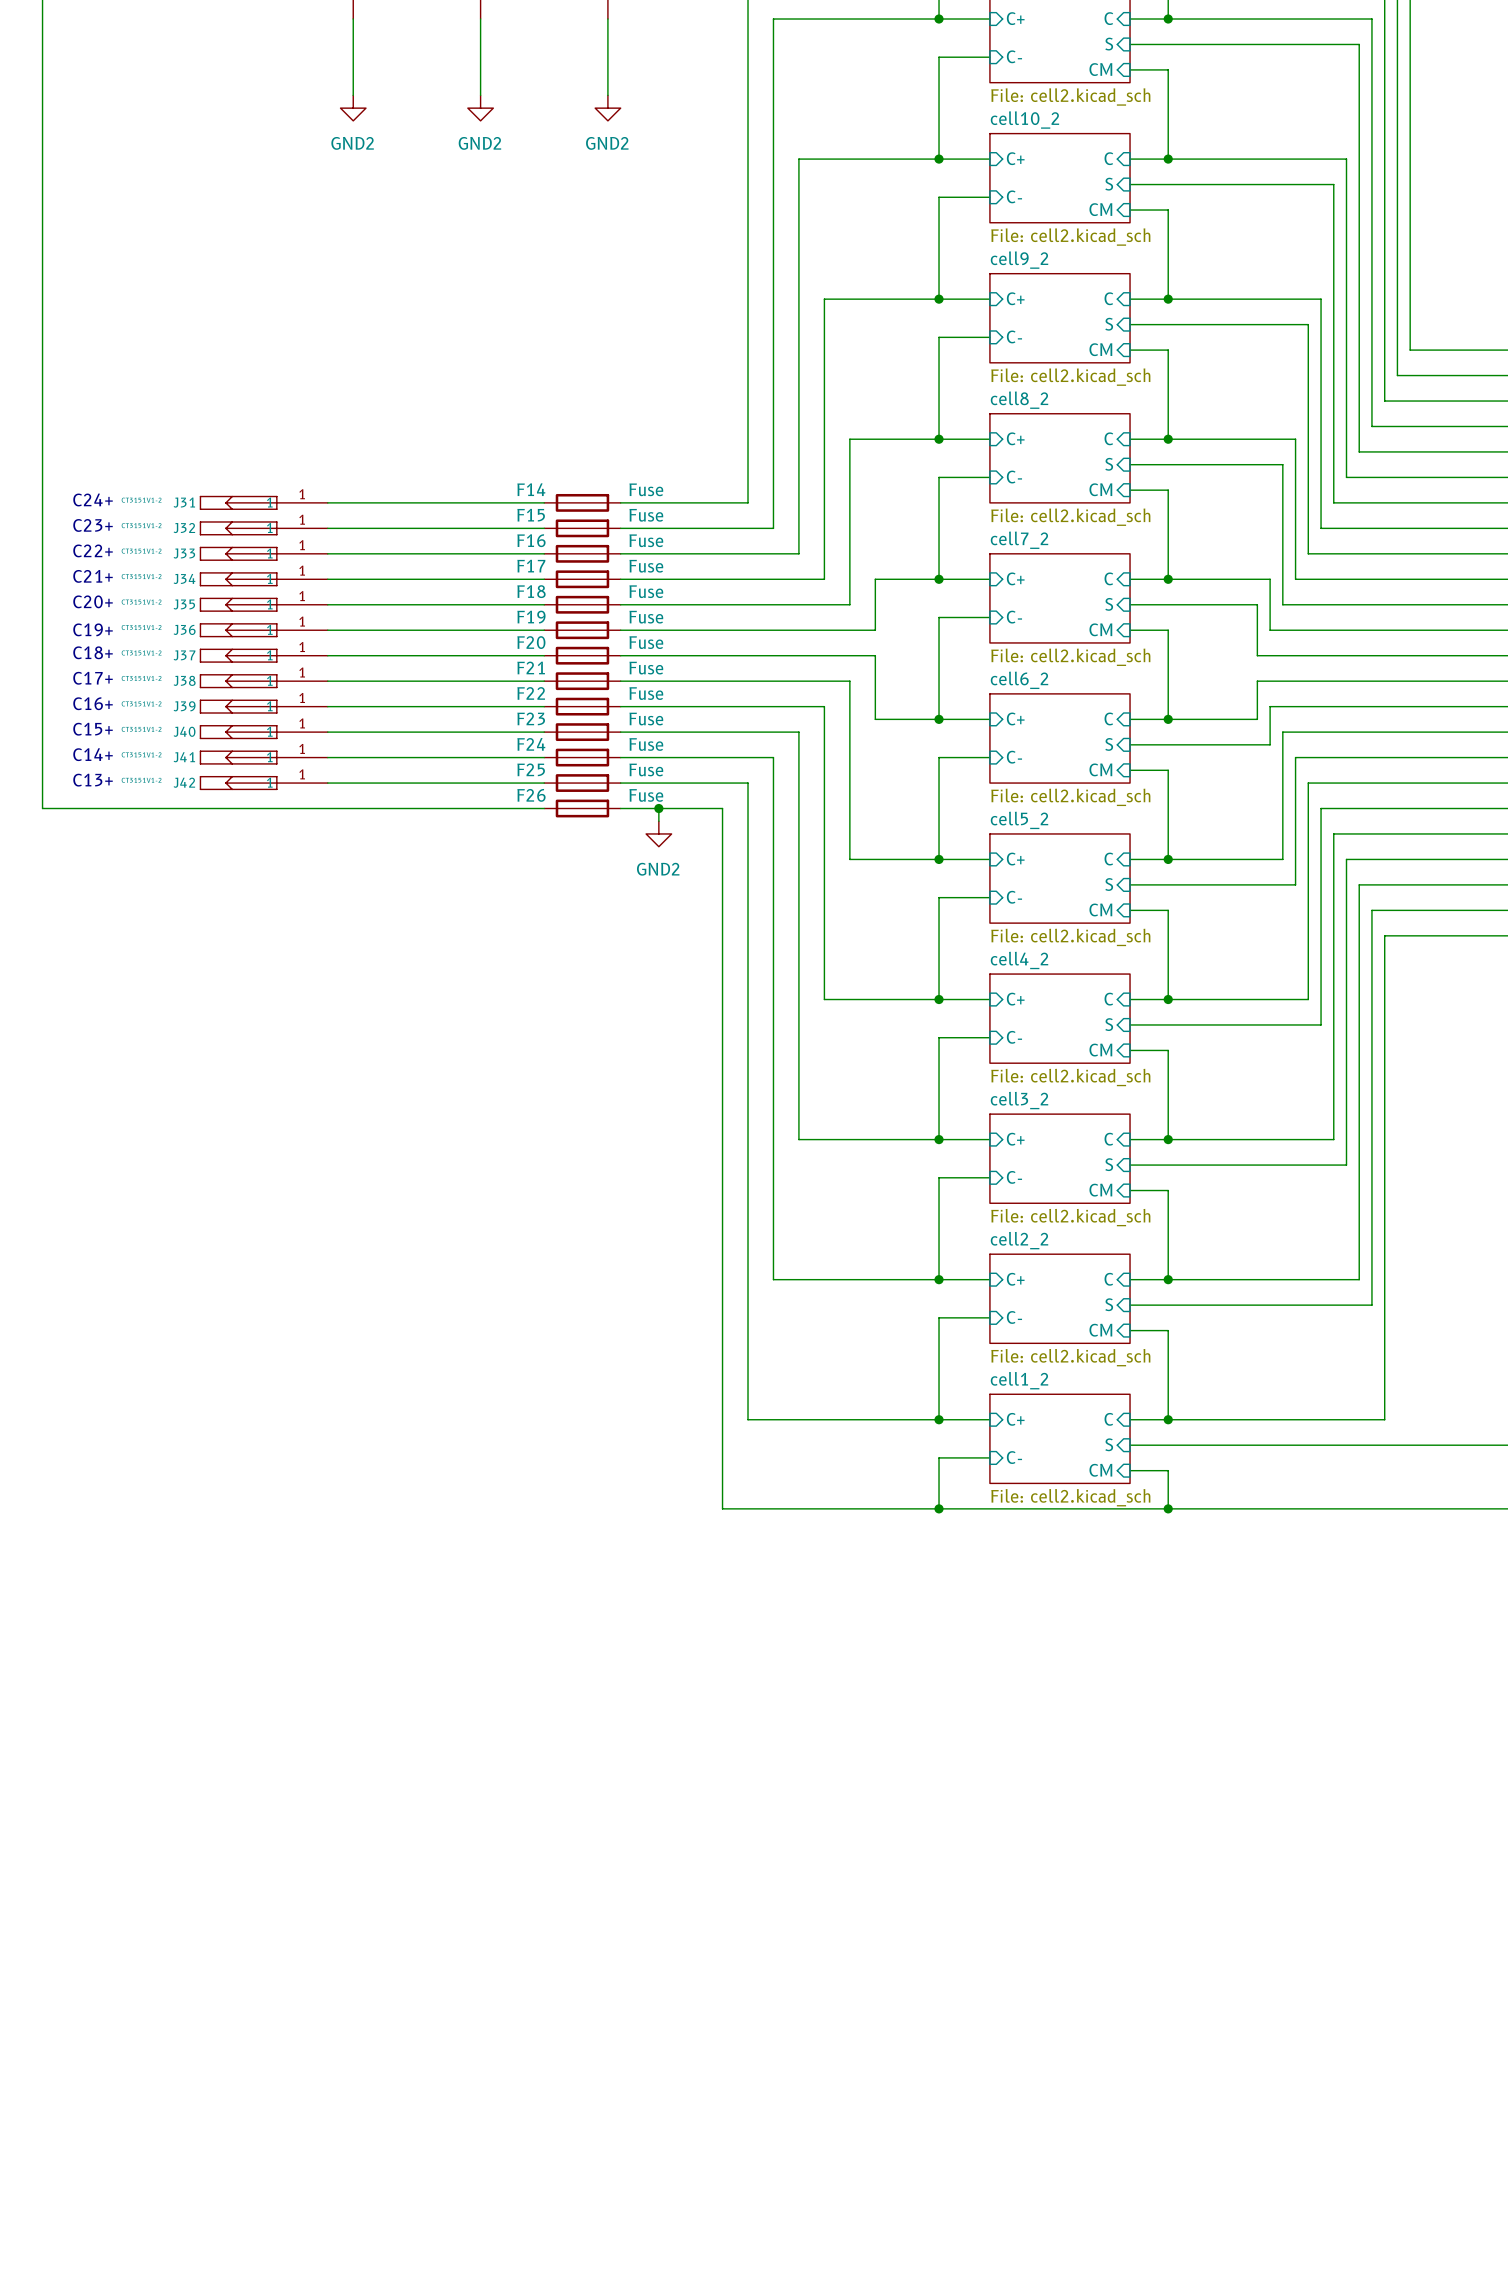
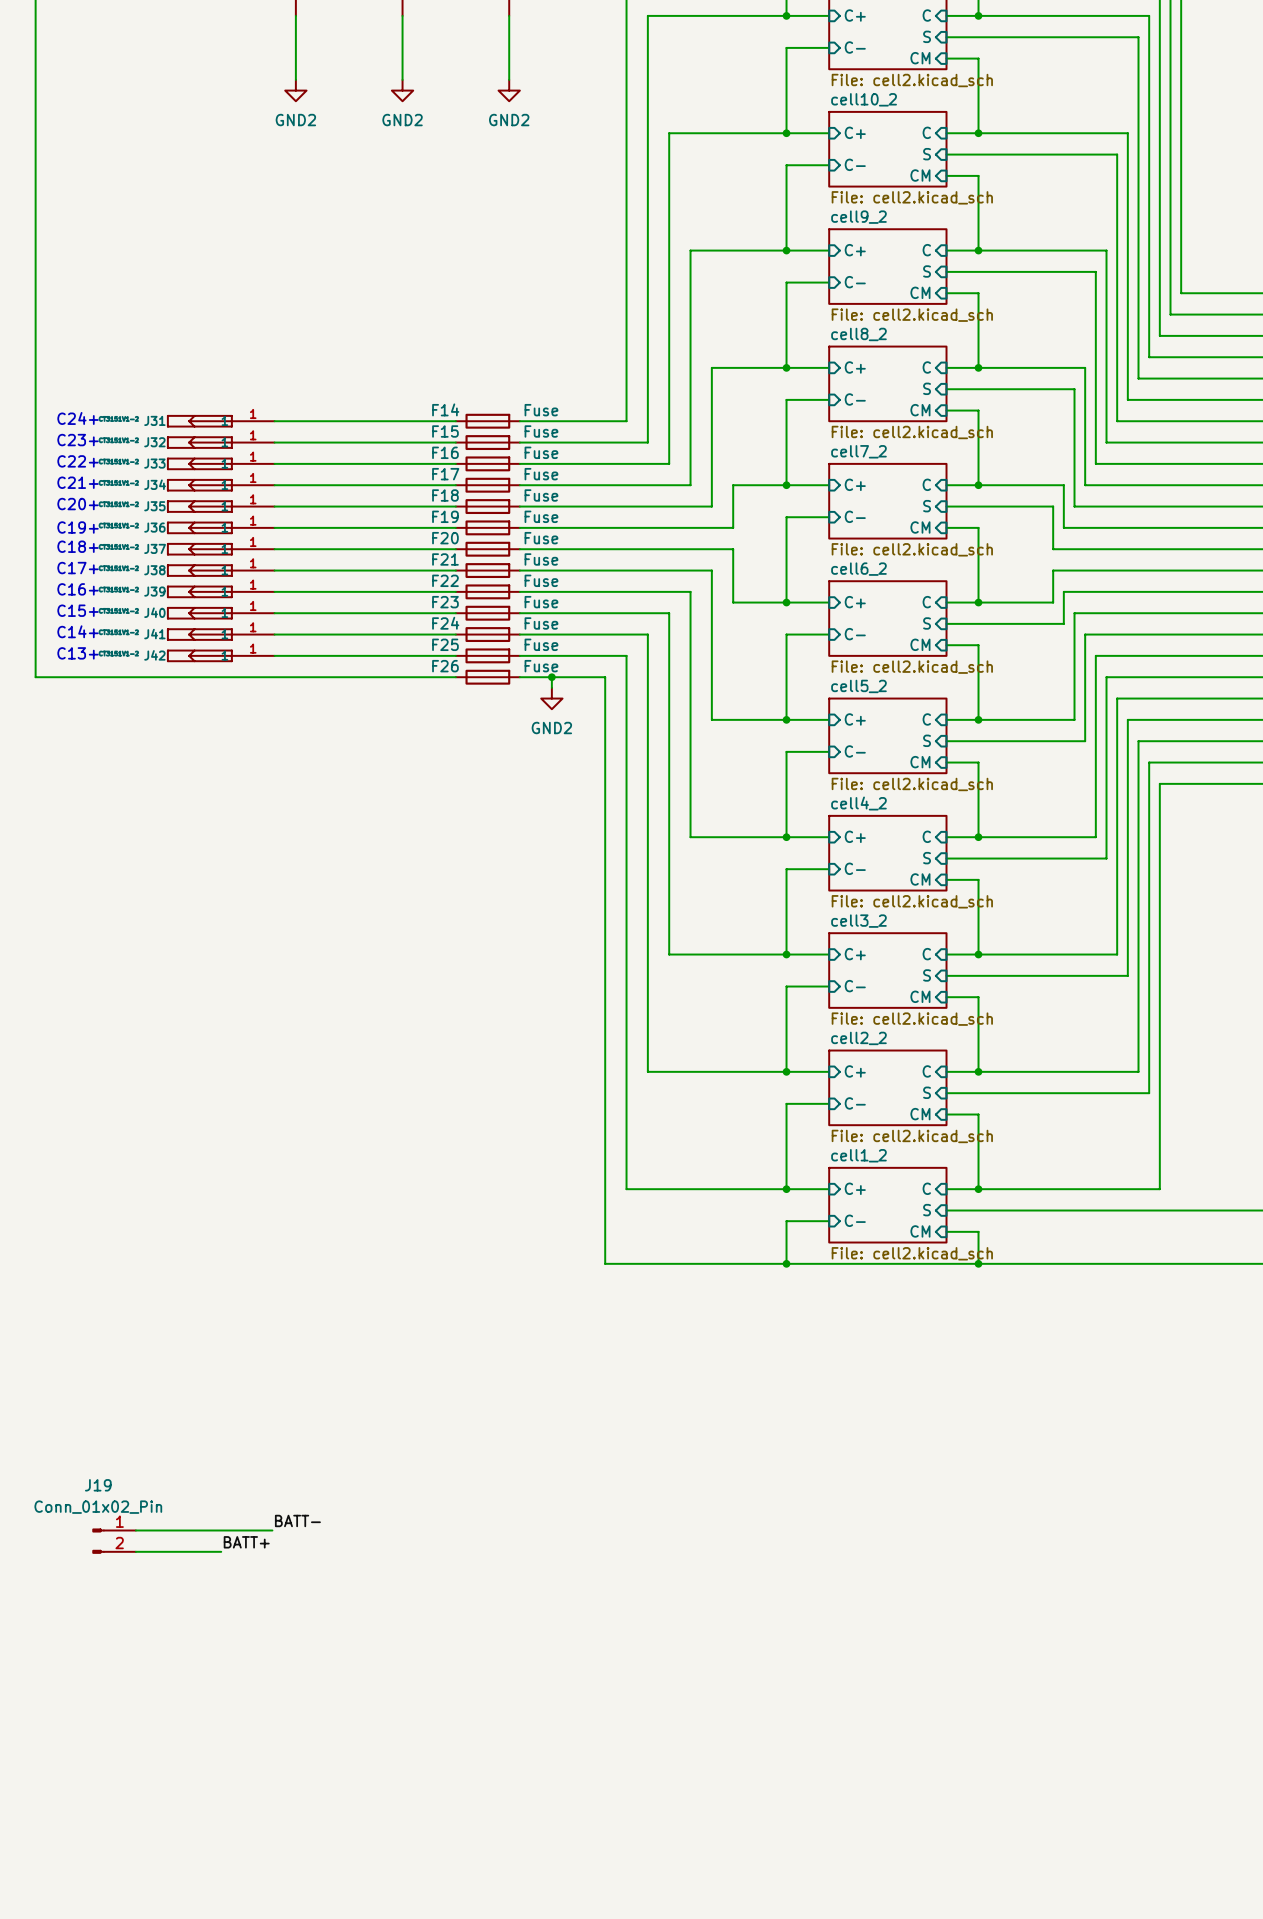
label: none -> BATT- (297, 1520)
wire: none -> (135, 1530) (272, 1530)
J19: none -> Conn_01x02_Pin (114, 1541)
label: none -> BATT+ (246, 1542)
wire: none -> (135, 1551) (221, 1551)

